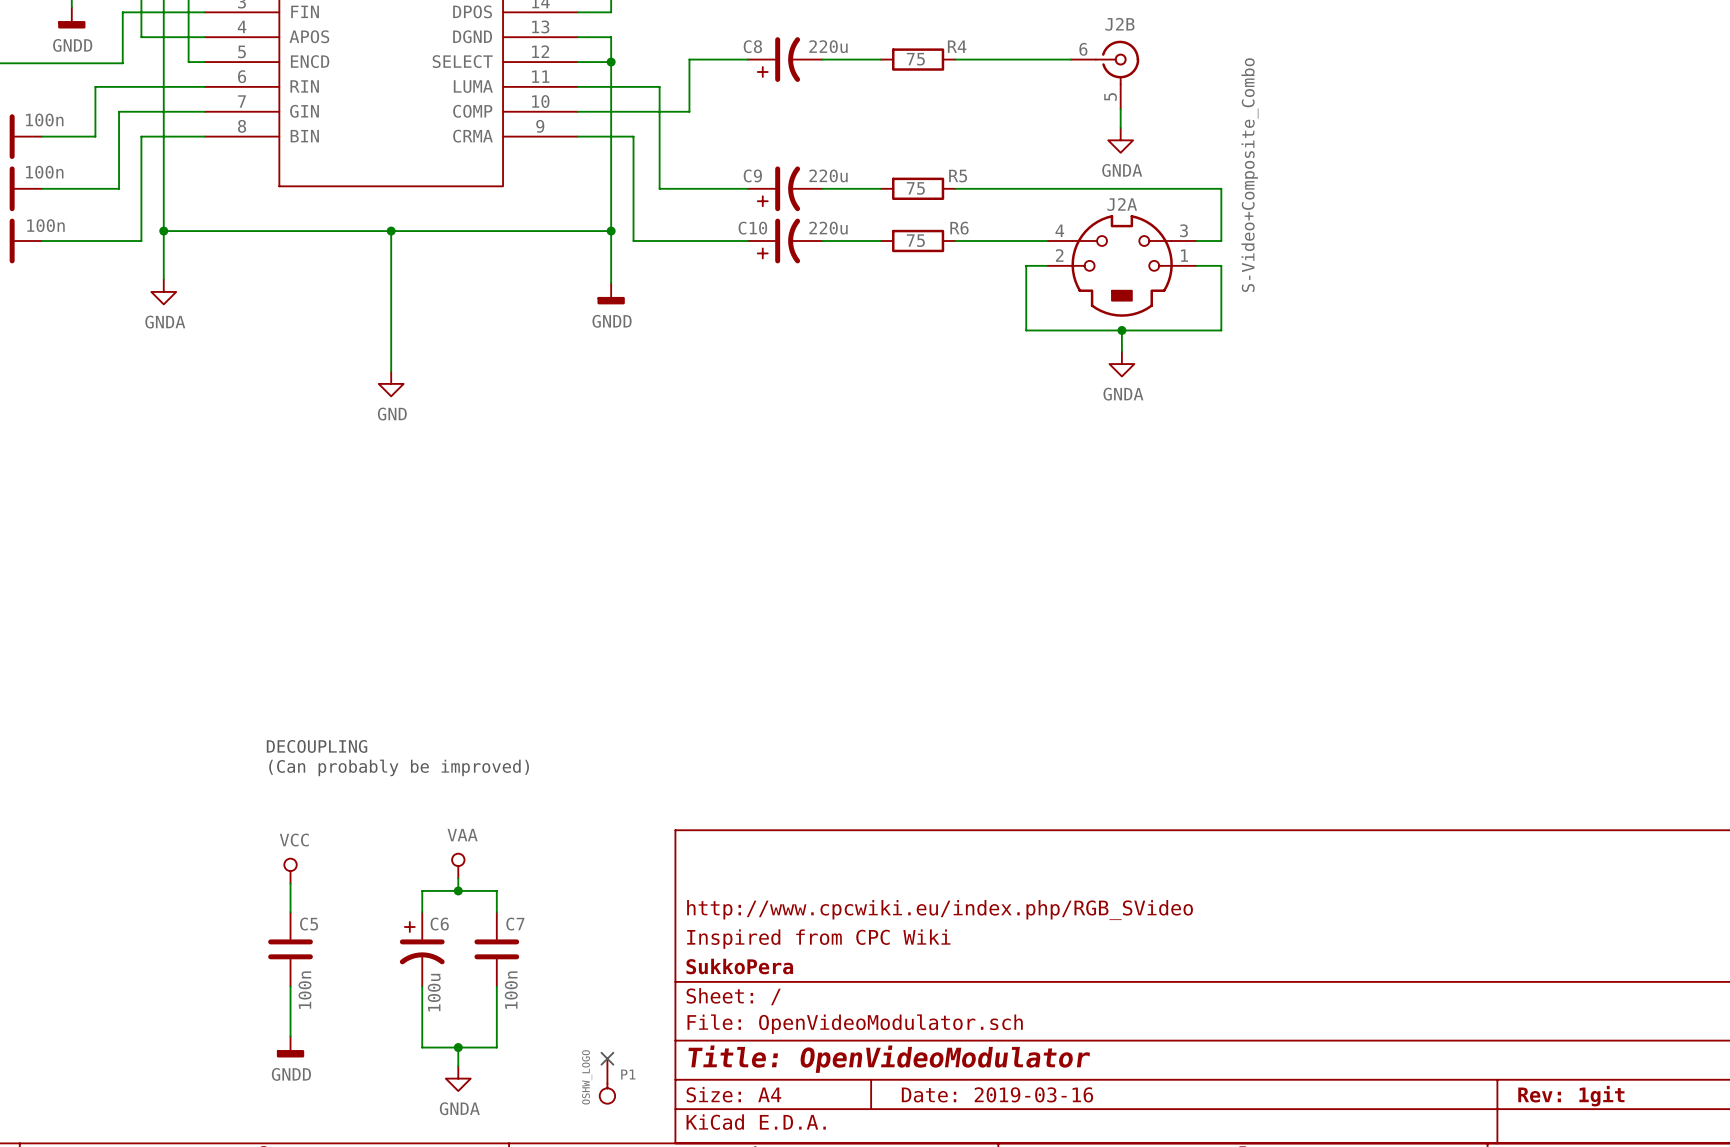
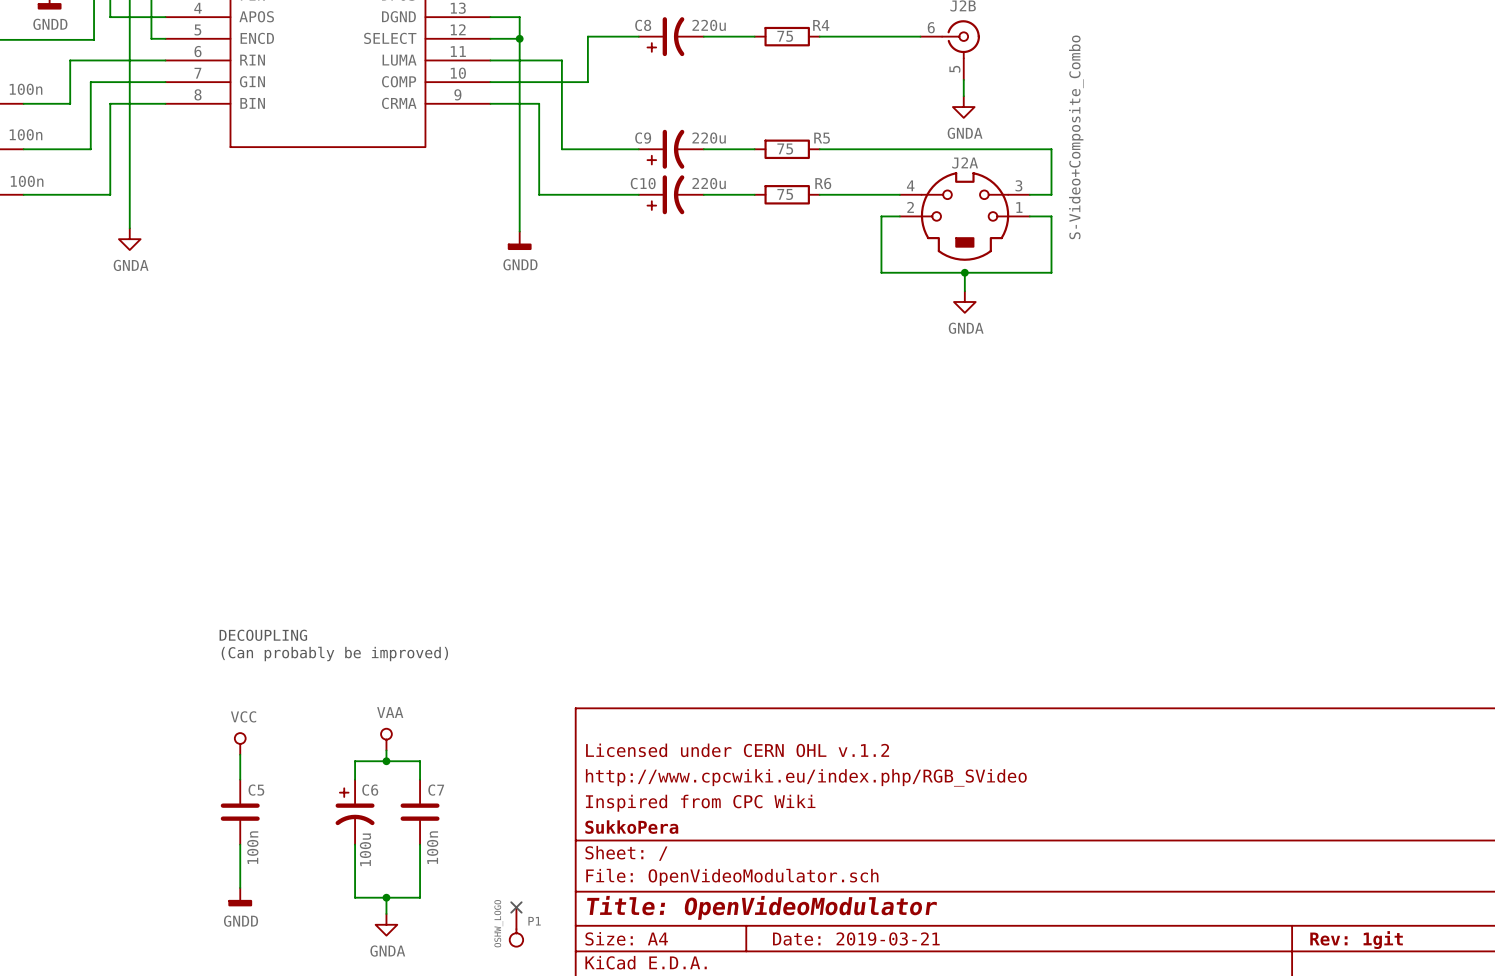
wire: (163, 231) (611, 231) -> none
junction: (163, 231) -> none
wire: (391, 231) (391, 371) -> none
junction: (391, 231) -> none
junction: (611, 231) -> none
power symbol: GND (391, 383) -> none
title block: none -> Licensed under CERN OHL v.1.2 (737, 750)
title block: Date: 2019-03-16 (997, 1094) -> Date: 2019-03-21 (856, 938)

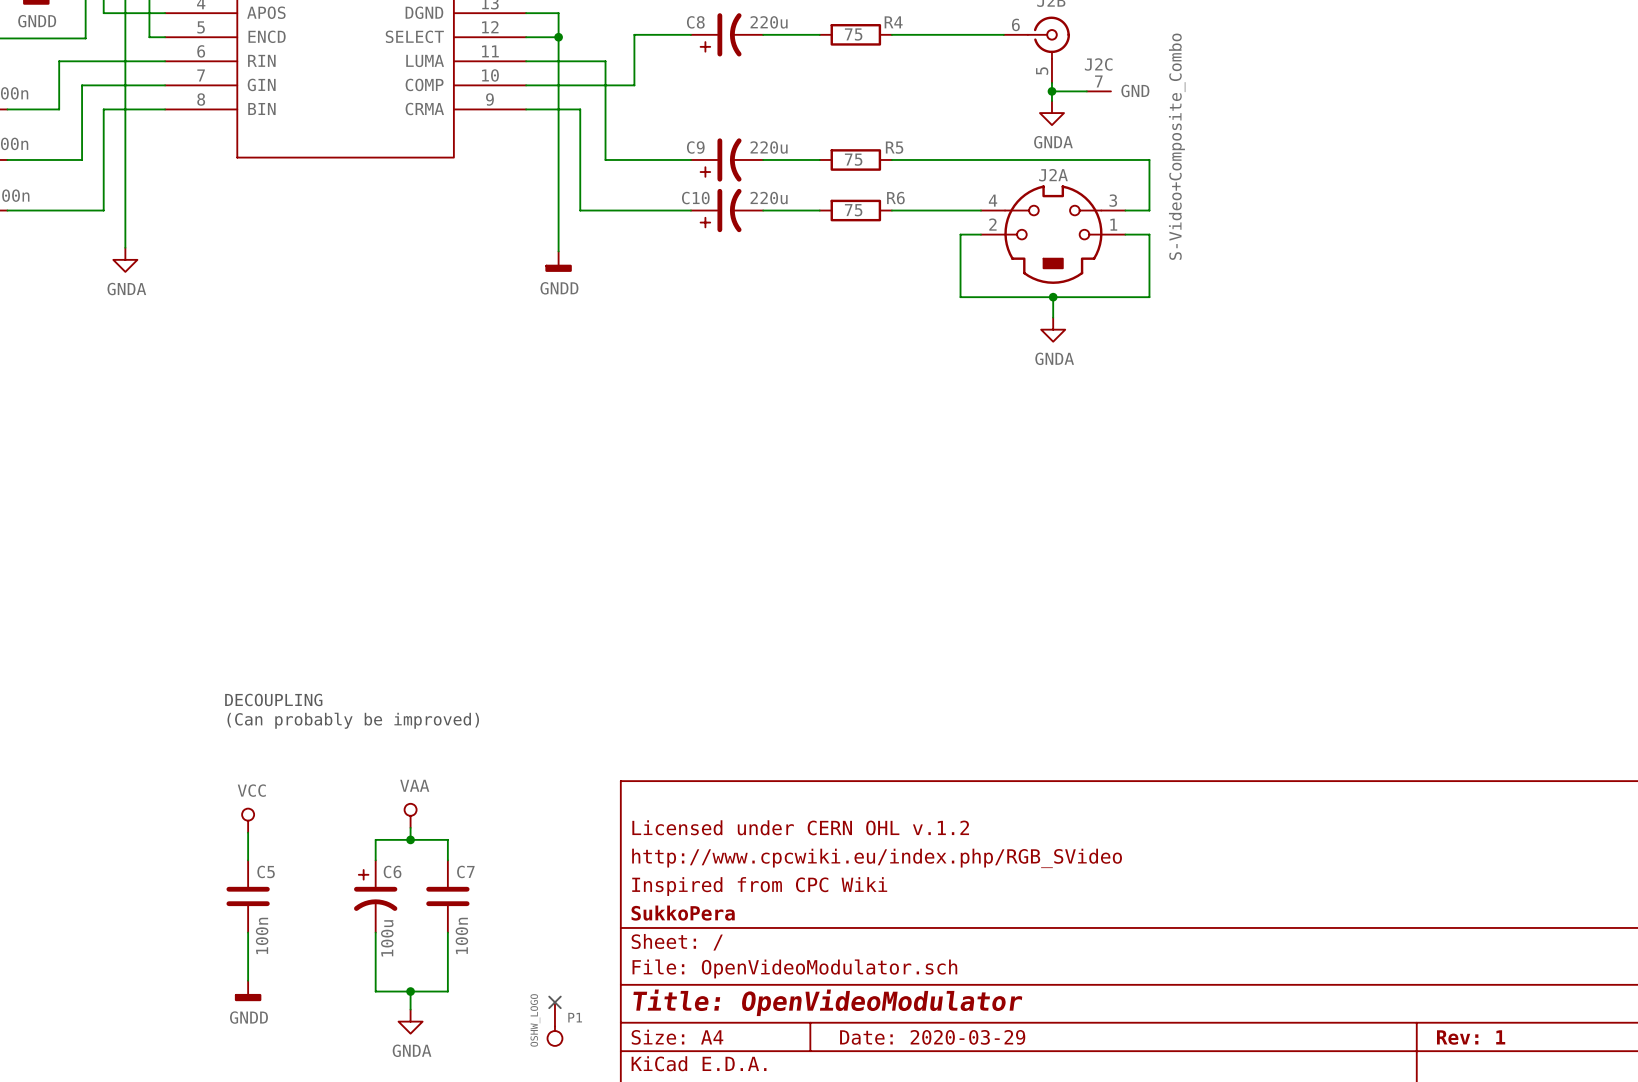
wire: none -> (1051, 91) (1086, 91)
junction: none -> (1051, 91)
J2C: none -> (1098, 91)
title block: Date: 2019-03-21 (856, 938) -> Date: 2020-03-29 (932, 1037)
title block: Rev: 1git (1356, 940) -> Rev: 1 (1471, 1037)

